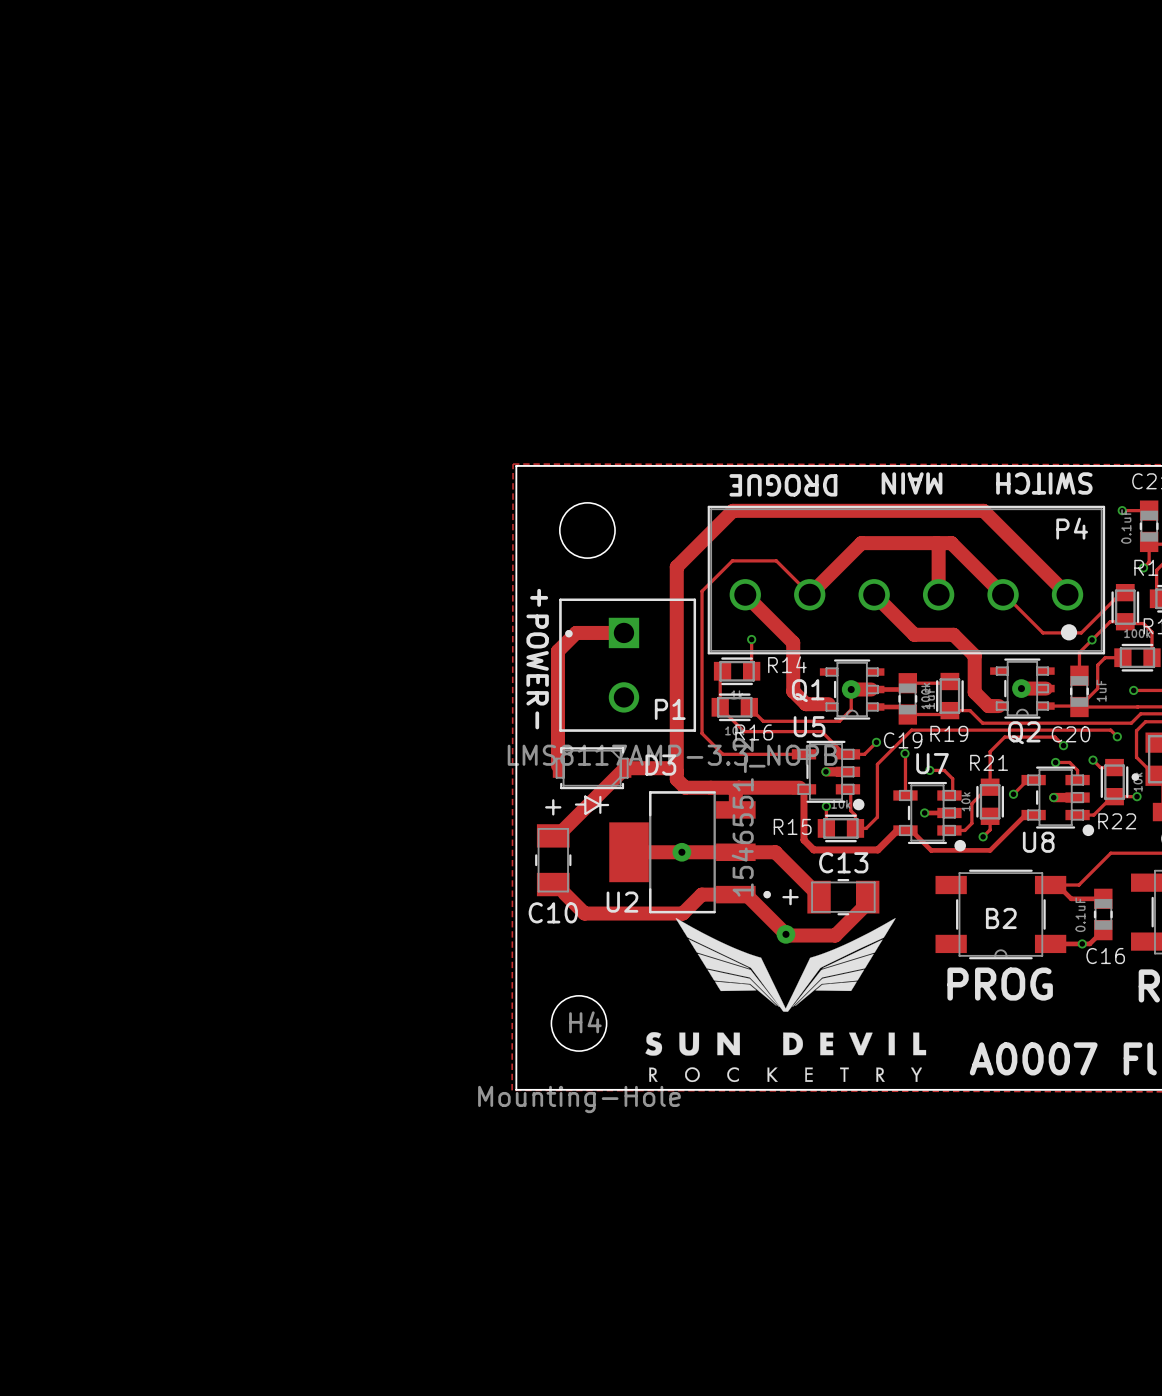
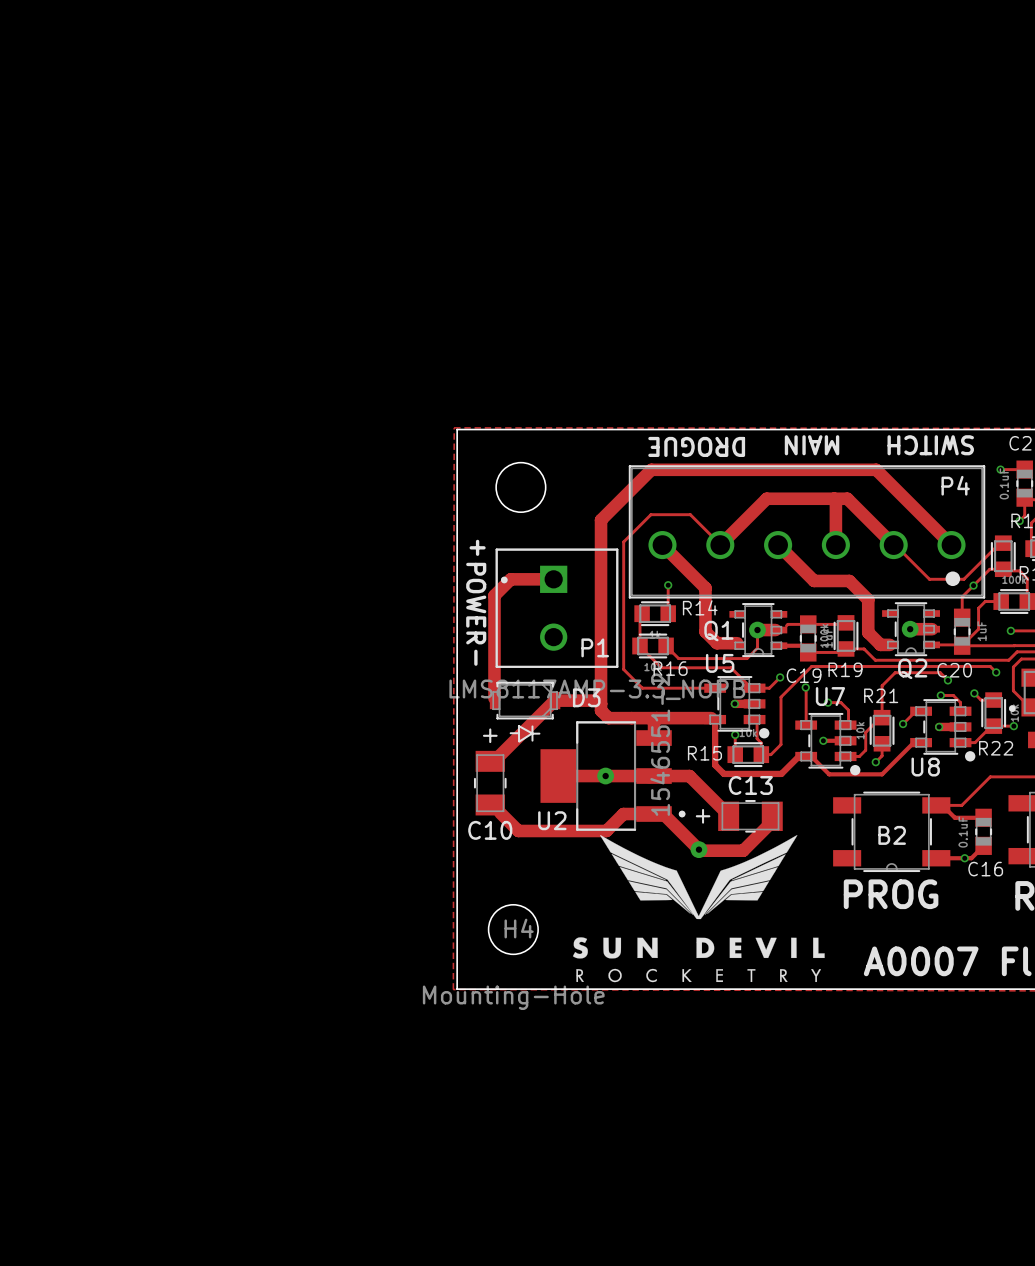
track: none -> (808, 624) (786, 625)
track: (875, 689) (901, 689) -> none

